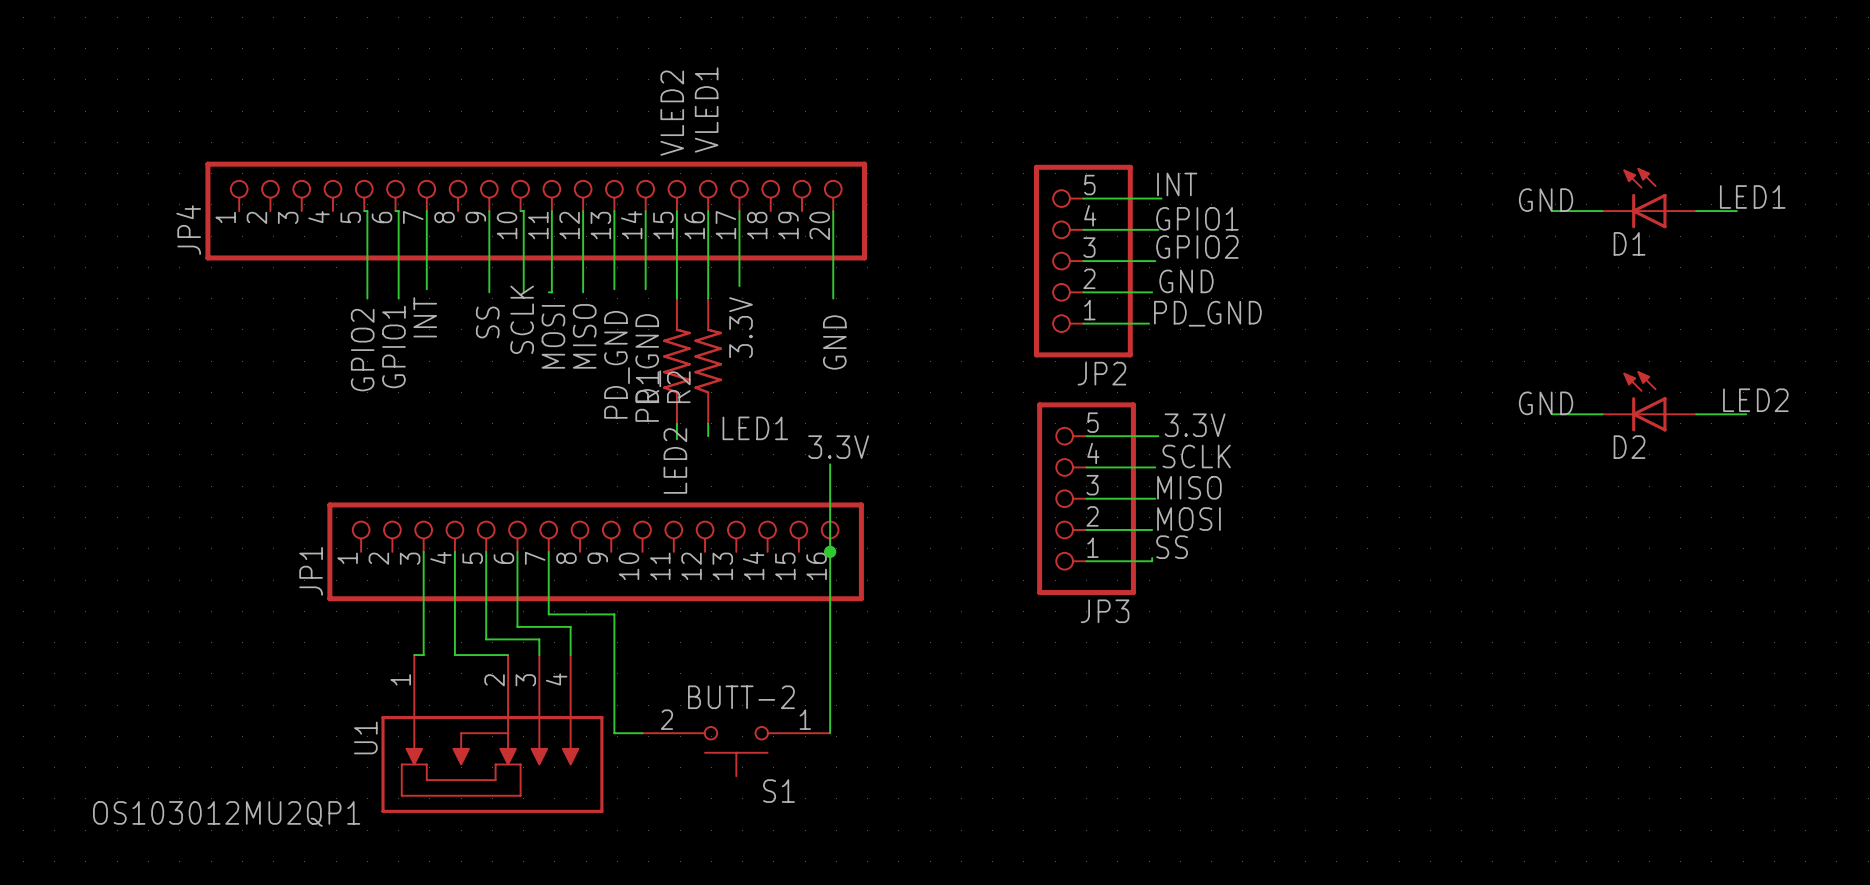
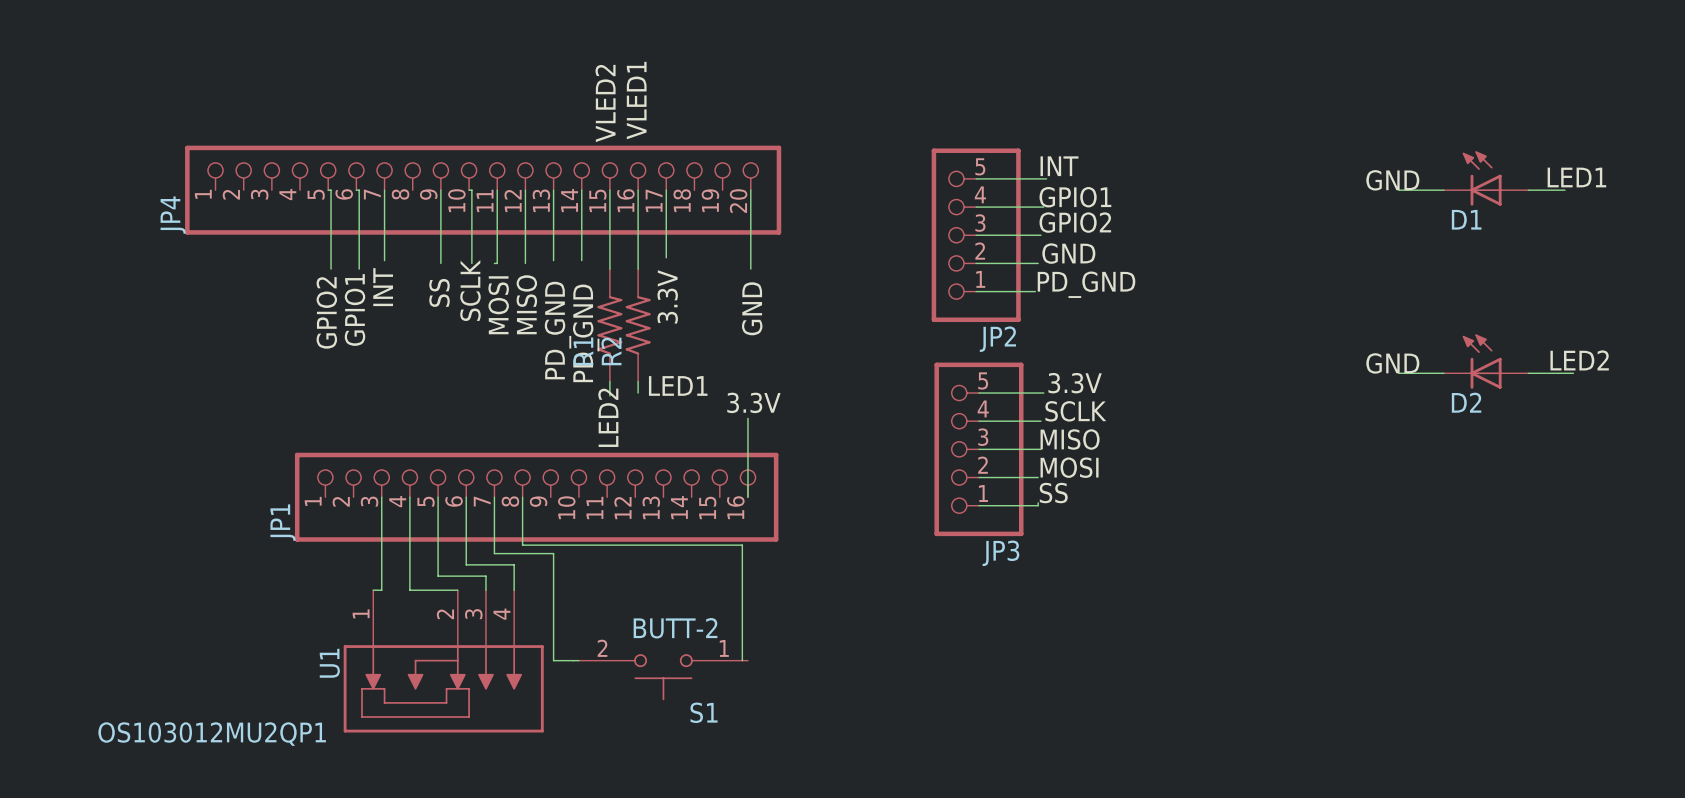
wire: none -> (522, 497) (522, 545) (742, 545) (742, 660)
wire: (830, 551) (830, 733) -> none
junction: (830, 551) -> none

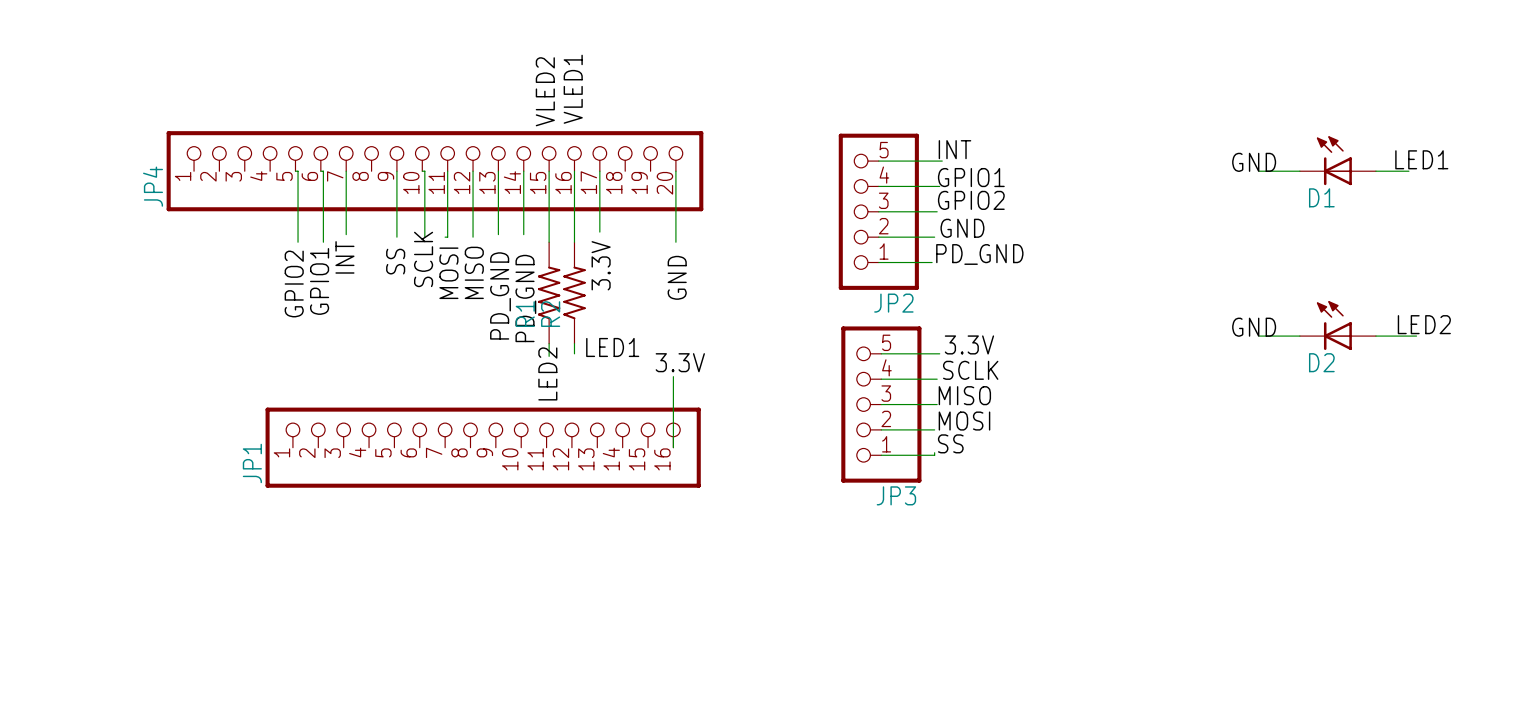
wire: (381, 497) (381, 590) (373, 590) -> none
wire: (409, 497) (409, 590) (457, 590) -> none
wire: (438, 497) (438, 576) (485, 576) (485, 590) -> none
wire: (466, 497) (466, 564) (514, 564) (514, 590) -> none
wire: (494, 497) (494, 553) (553, 553) (553, 660) (578, 660) -> none
wire: (522, 497) (522, 545) (742, 545) (742, 660) -> none
U1: OS103012MU2QP1 (443, 661) -> none
S1: BUTT-2 (663, 677) -> none

